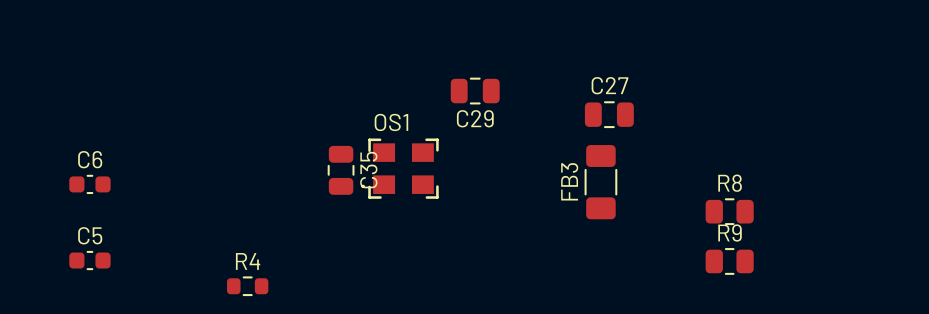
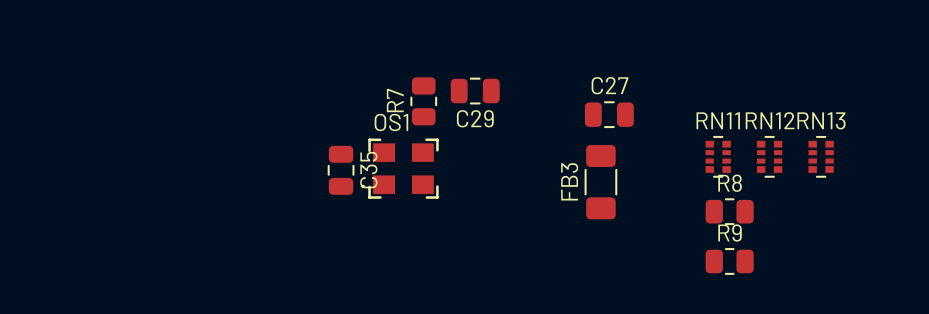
R7: none -> (423, 101)
RN11: none -> (718, 156)
RN12: none -> (769, 156)
RN13: none -> (821, 156)
C6: (89, 184) -> none
C5: (89, 260) -> none
R4: (247, 286) -> none

